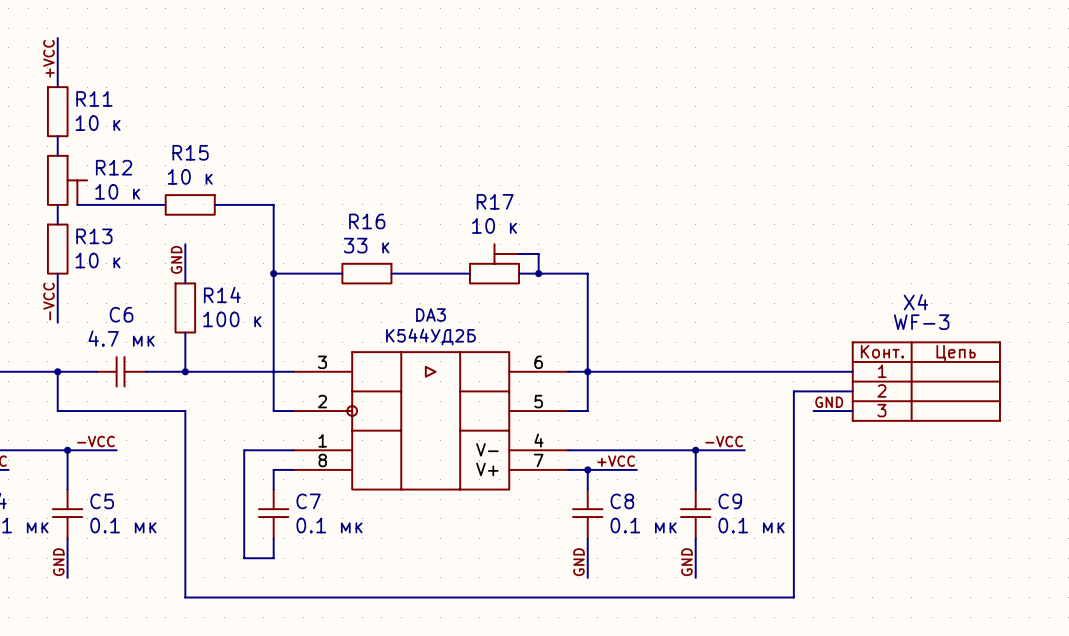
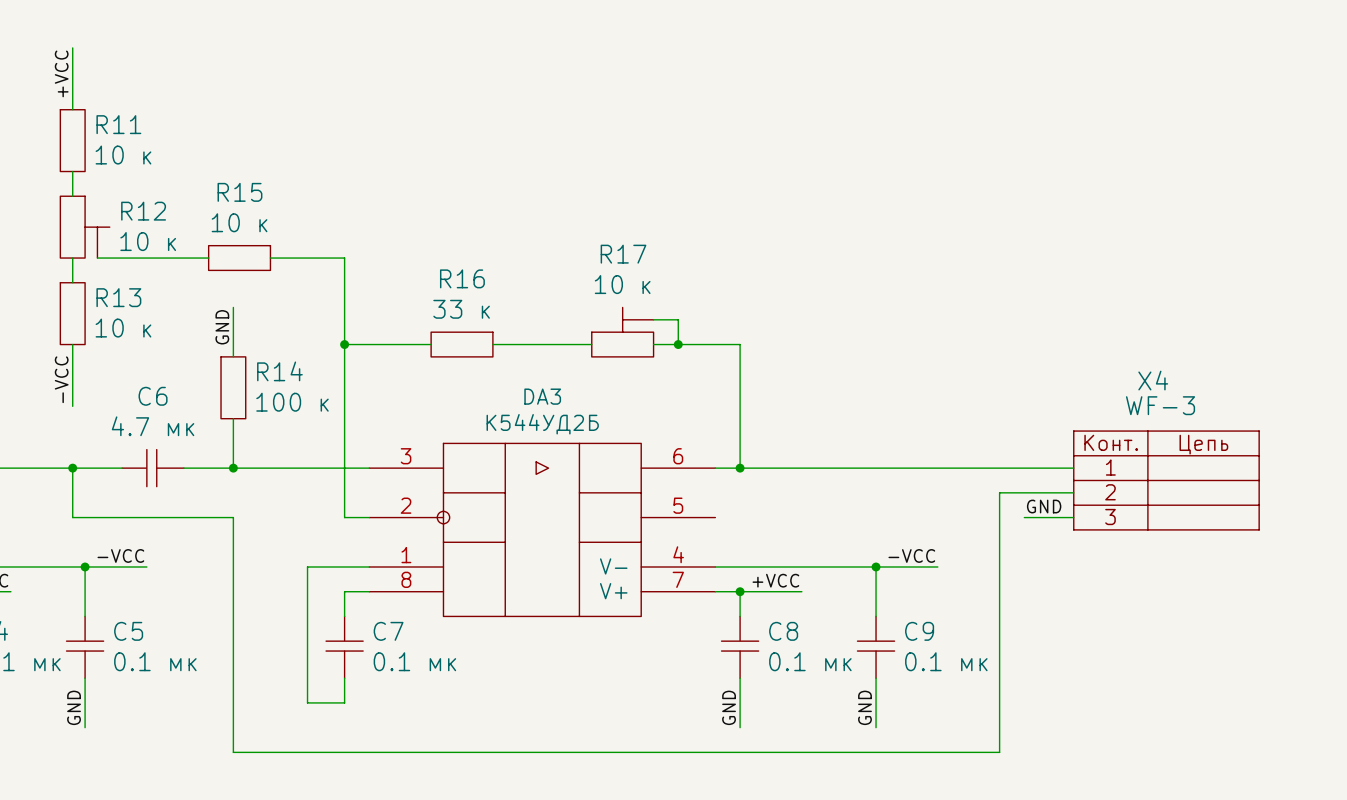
wire: (587, 371) (587, 411) (568, 411) -> none

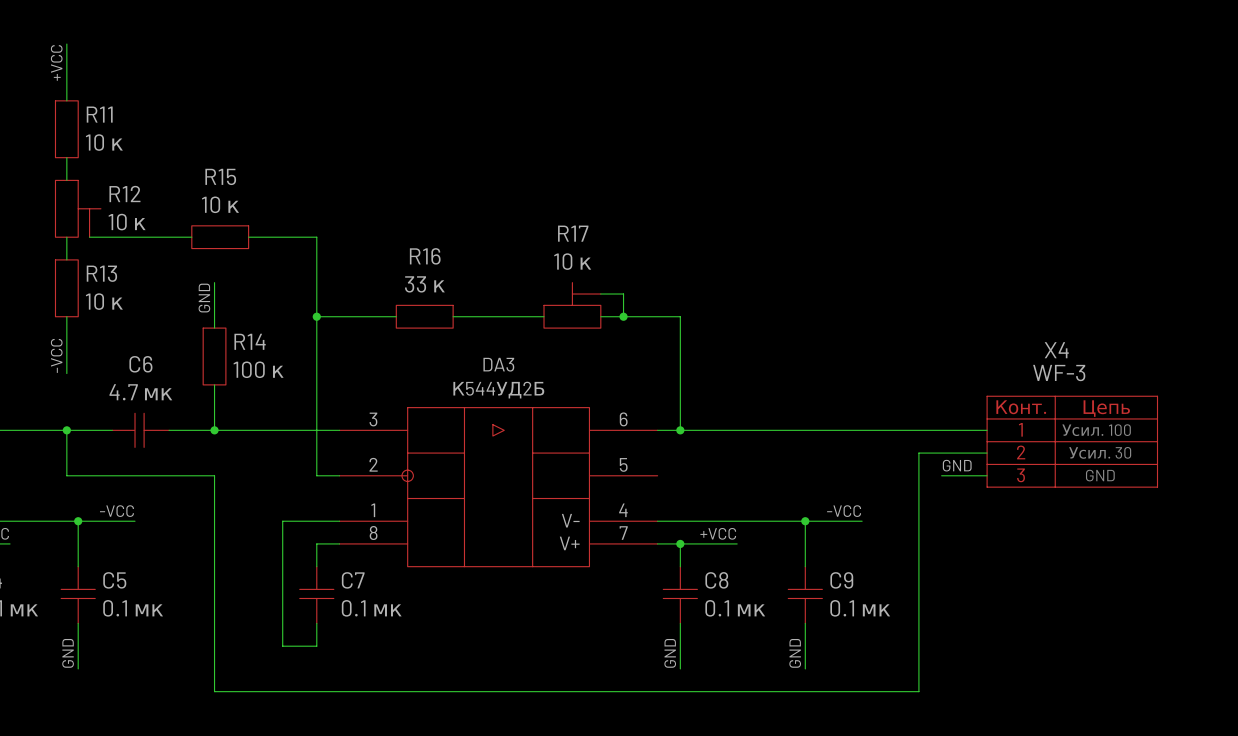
text: none -> Усил. 100 (1096, 430)
text: none -> Усил. 30 (1100, 452)
text: none -> GND (1100, 475)

